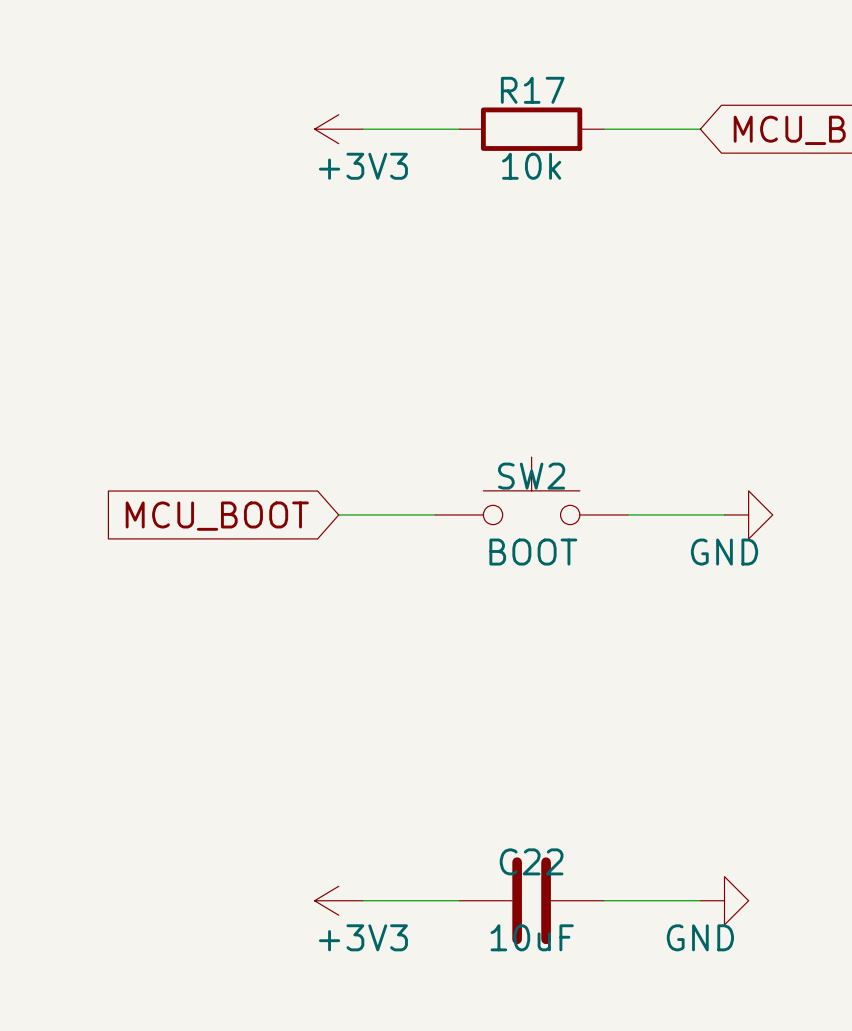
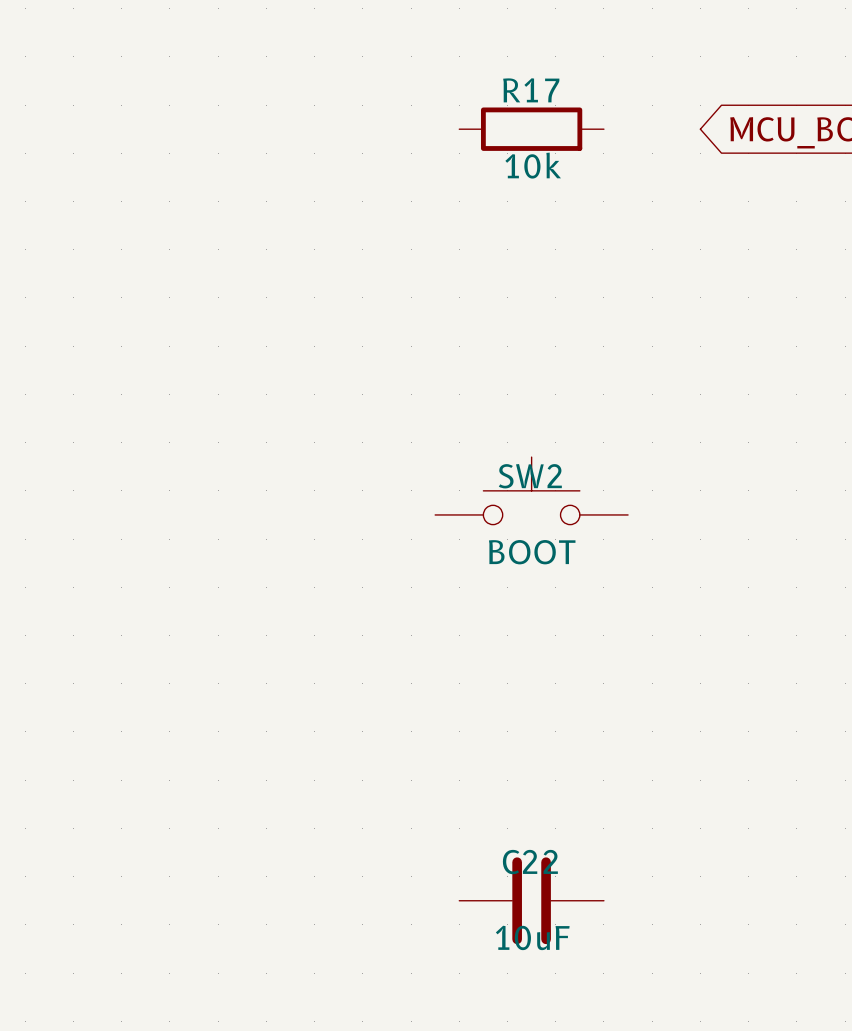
power symbol: +3V3 (338, 129) -> none
wire: (362, 129) (459, 129) -> none
wire: (603, 129) (700, 129) -> none
wire: (338, 514) (435, 514) -> none
wire: (628, 514) (724, 514) -> none
power symbol: GND (748, 514) -> none
global label: MCU_BOOT (217, 516) -> none
power symbol: +3V3 (338, 900) -> none
wire: (362, 900) (459, 900) -> none
wire: (603, 900) (700, 900) -> none
power symbol: GND (724, 900) -> none

